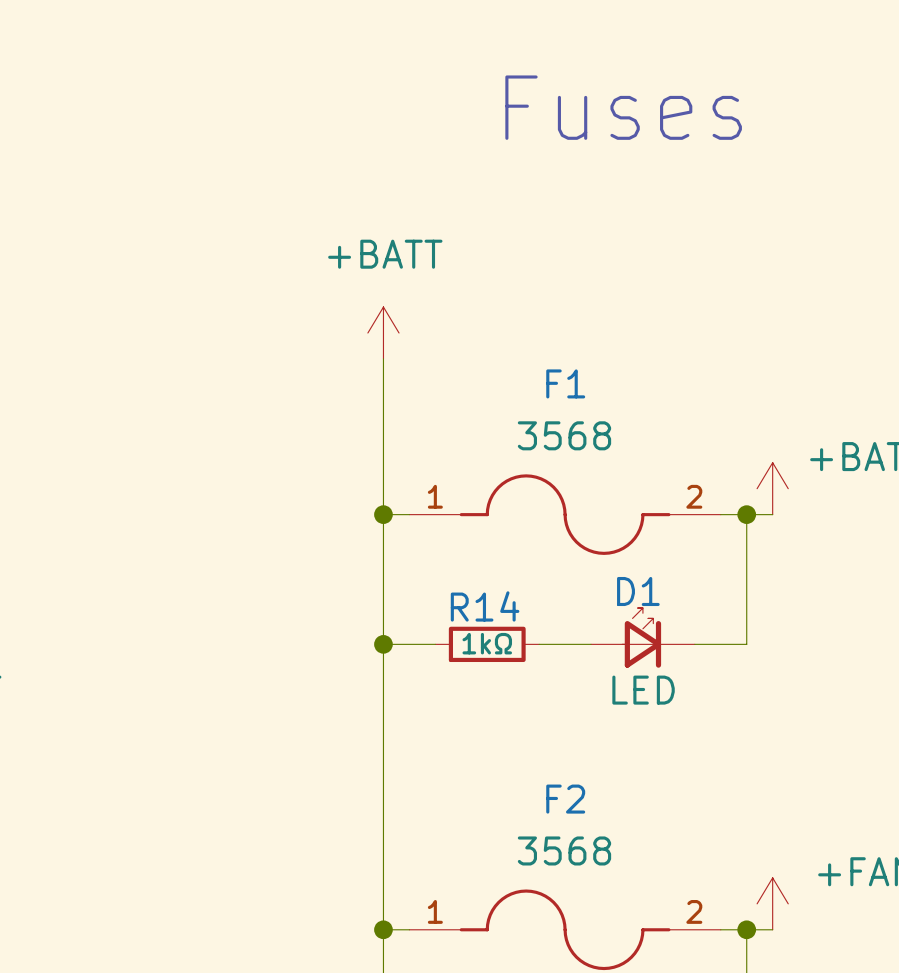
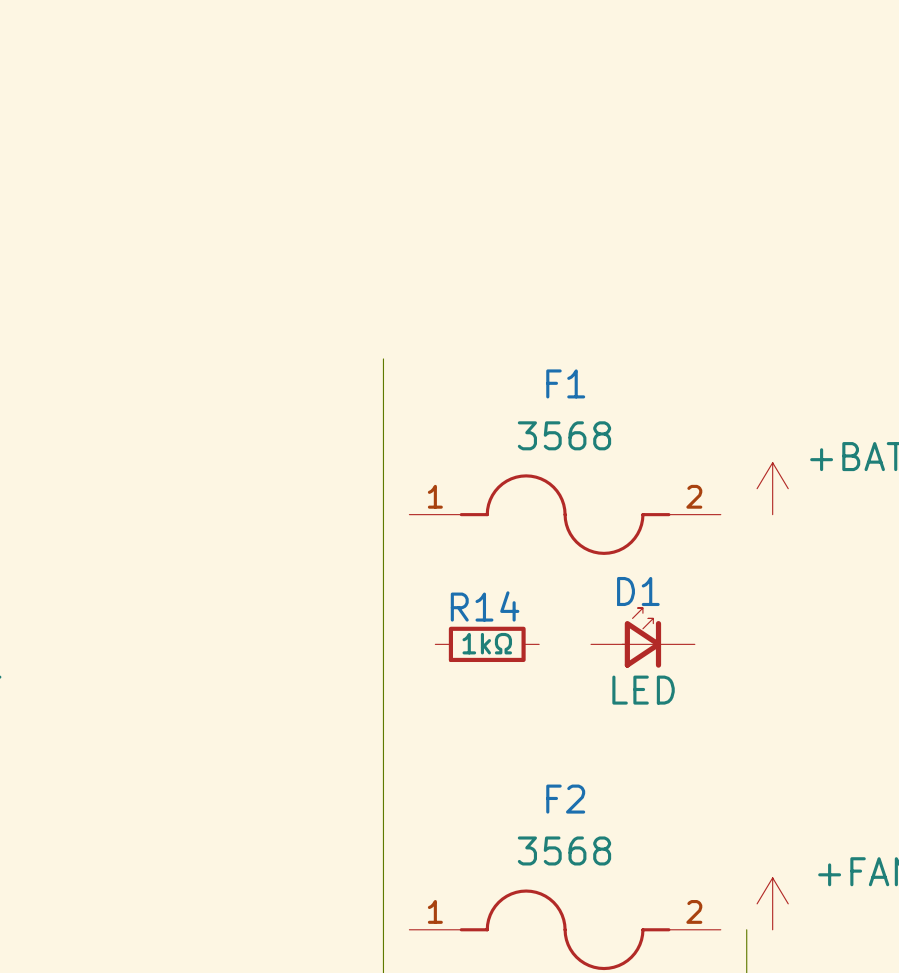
text: Fuses (623, 107) -> none
power symbol: +BATT (383, 333) -> none
wire: (383, 514) (409, 514) -> none
junction: (383, 514) -> none
wire: (720, 514) (772, 514) -> none
wire: (746, 514) (746, 644) (694, 644) -> none
junction: (746, 514) -> none
wire: (383, 644) (435, 644) -> none
junction: (383, 644) -> none
wire: (539, 644) (591, 644) -> none
wire: (383, 929) (409, 929) -> none
junction: (383, 929) -> none
wire: (720, 929) (772, 929) -> none
junction: (746, 929) -> none

